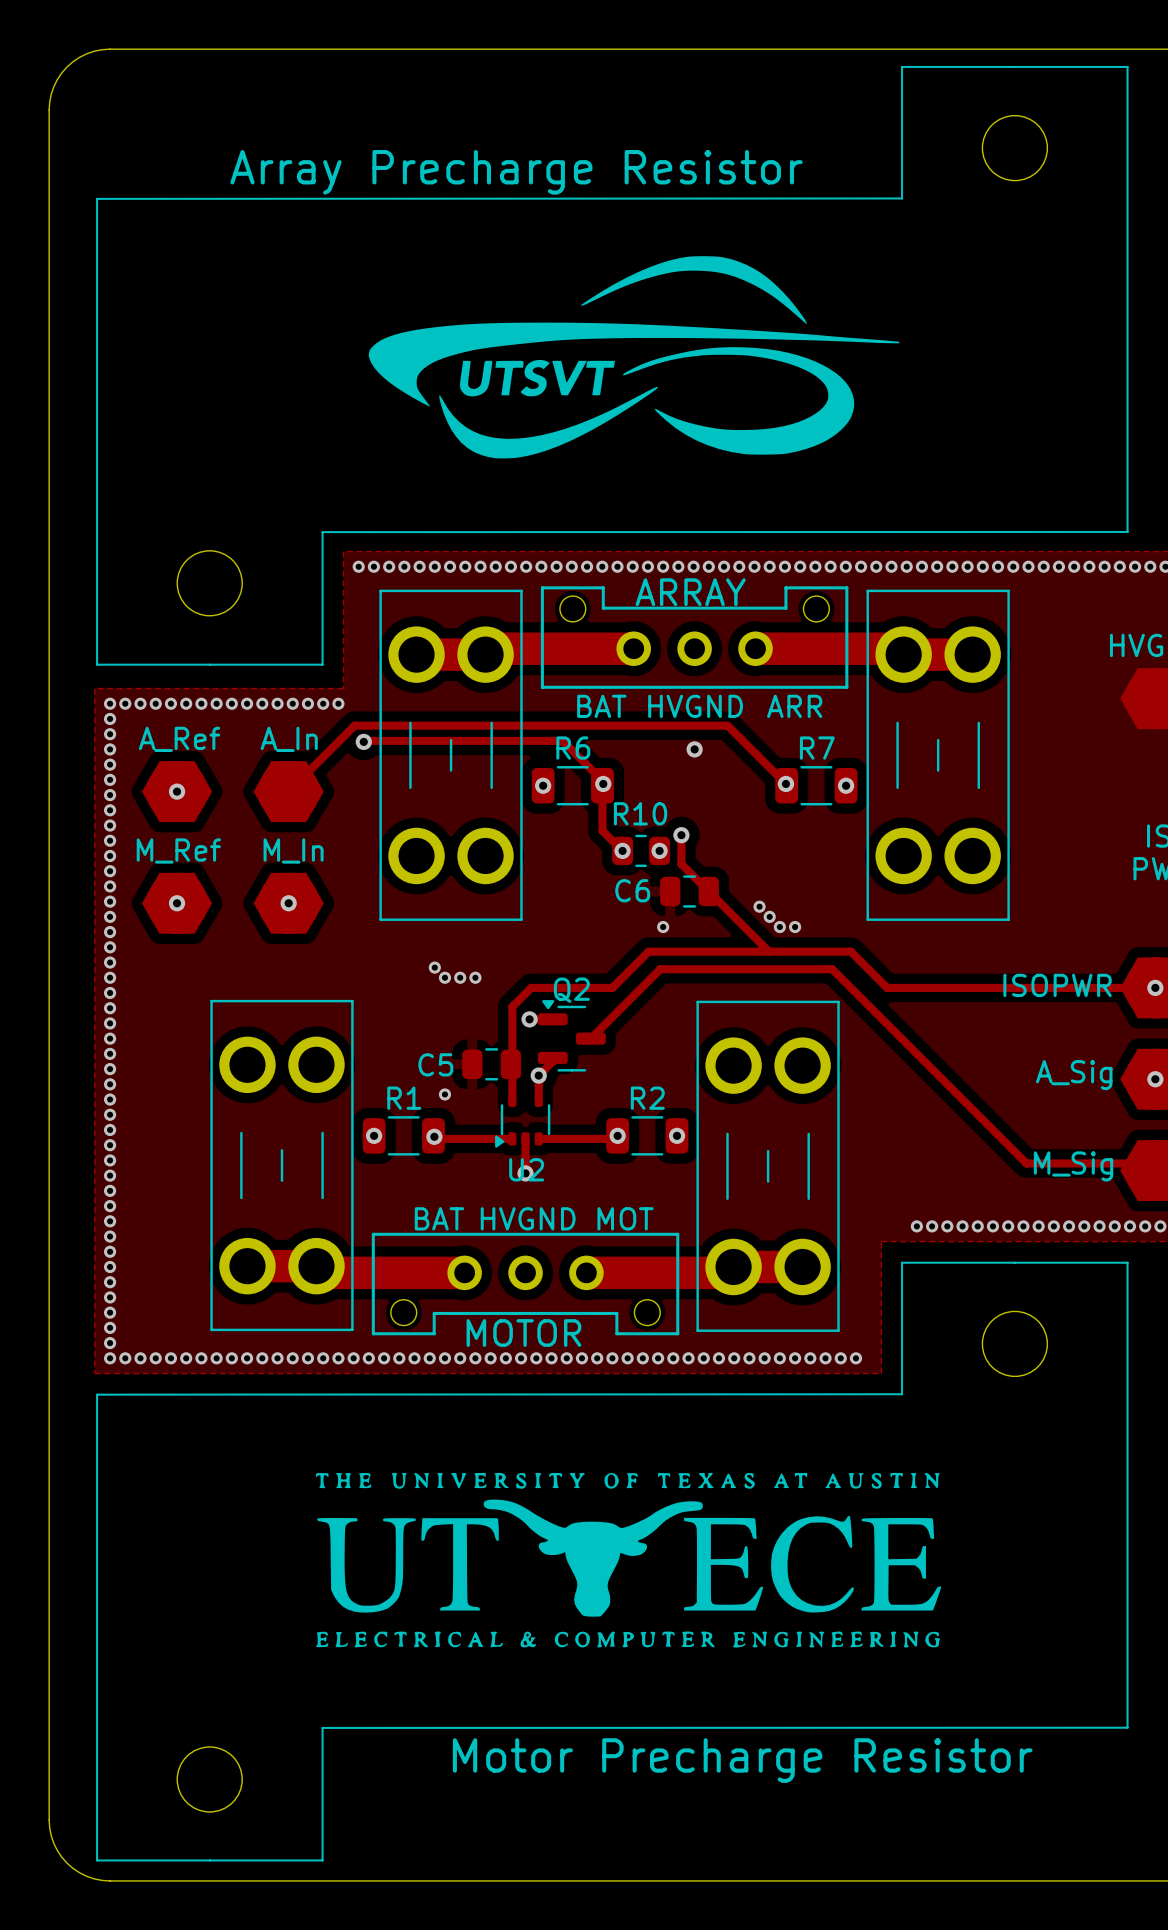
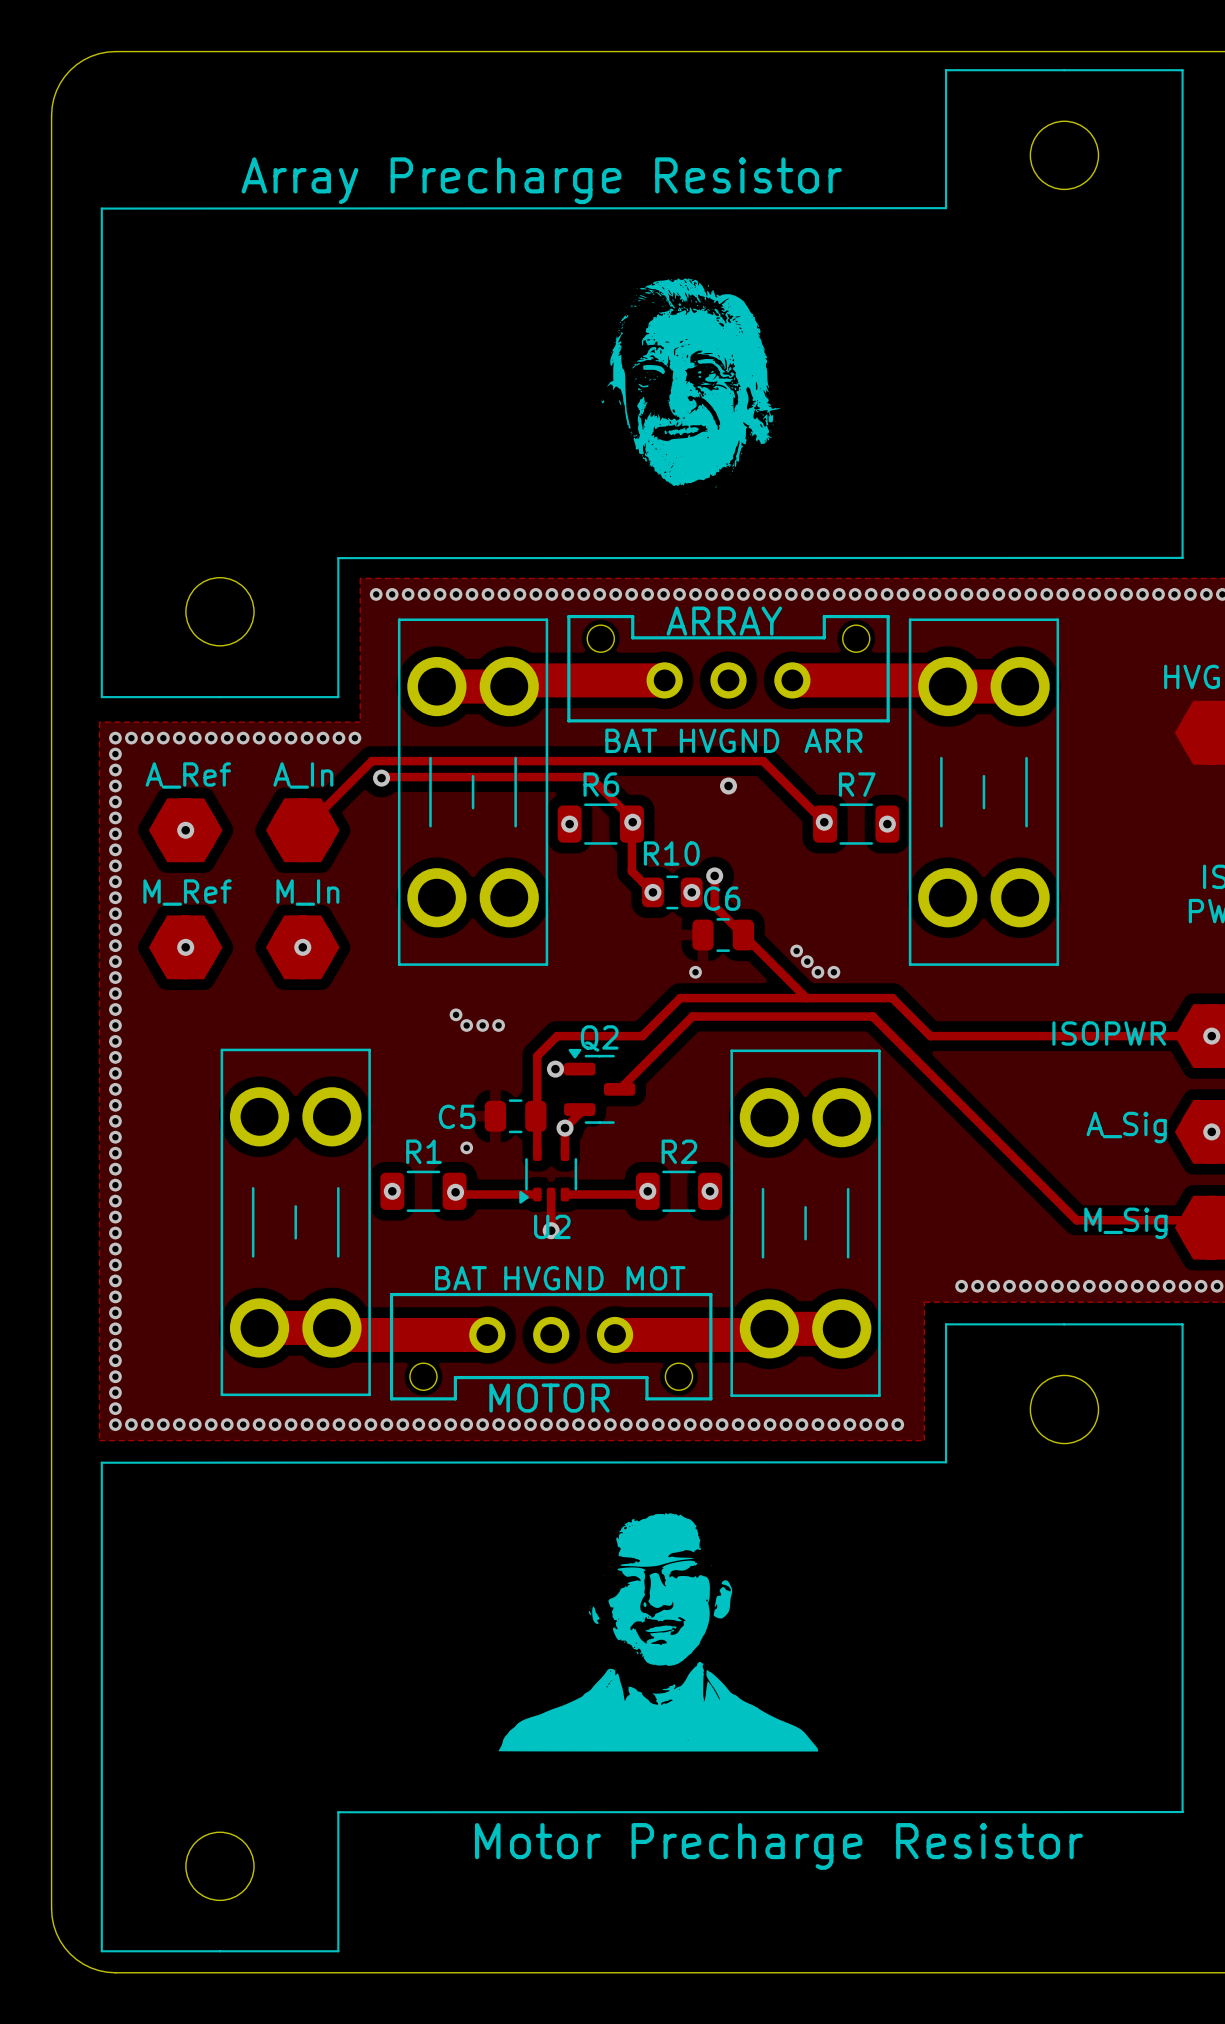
drawing: [368, 256, 900, 459] -> none
drawing: none -> [601, 278, 781, 495]
C6 name position: C6 (632, 890) -> C6 (722, 898)
drawing shape: [315, 1472, 942, 1648] -> [498, 1513, 819, 1752]

